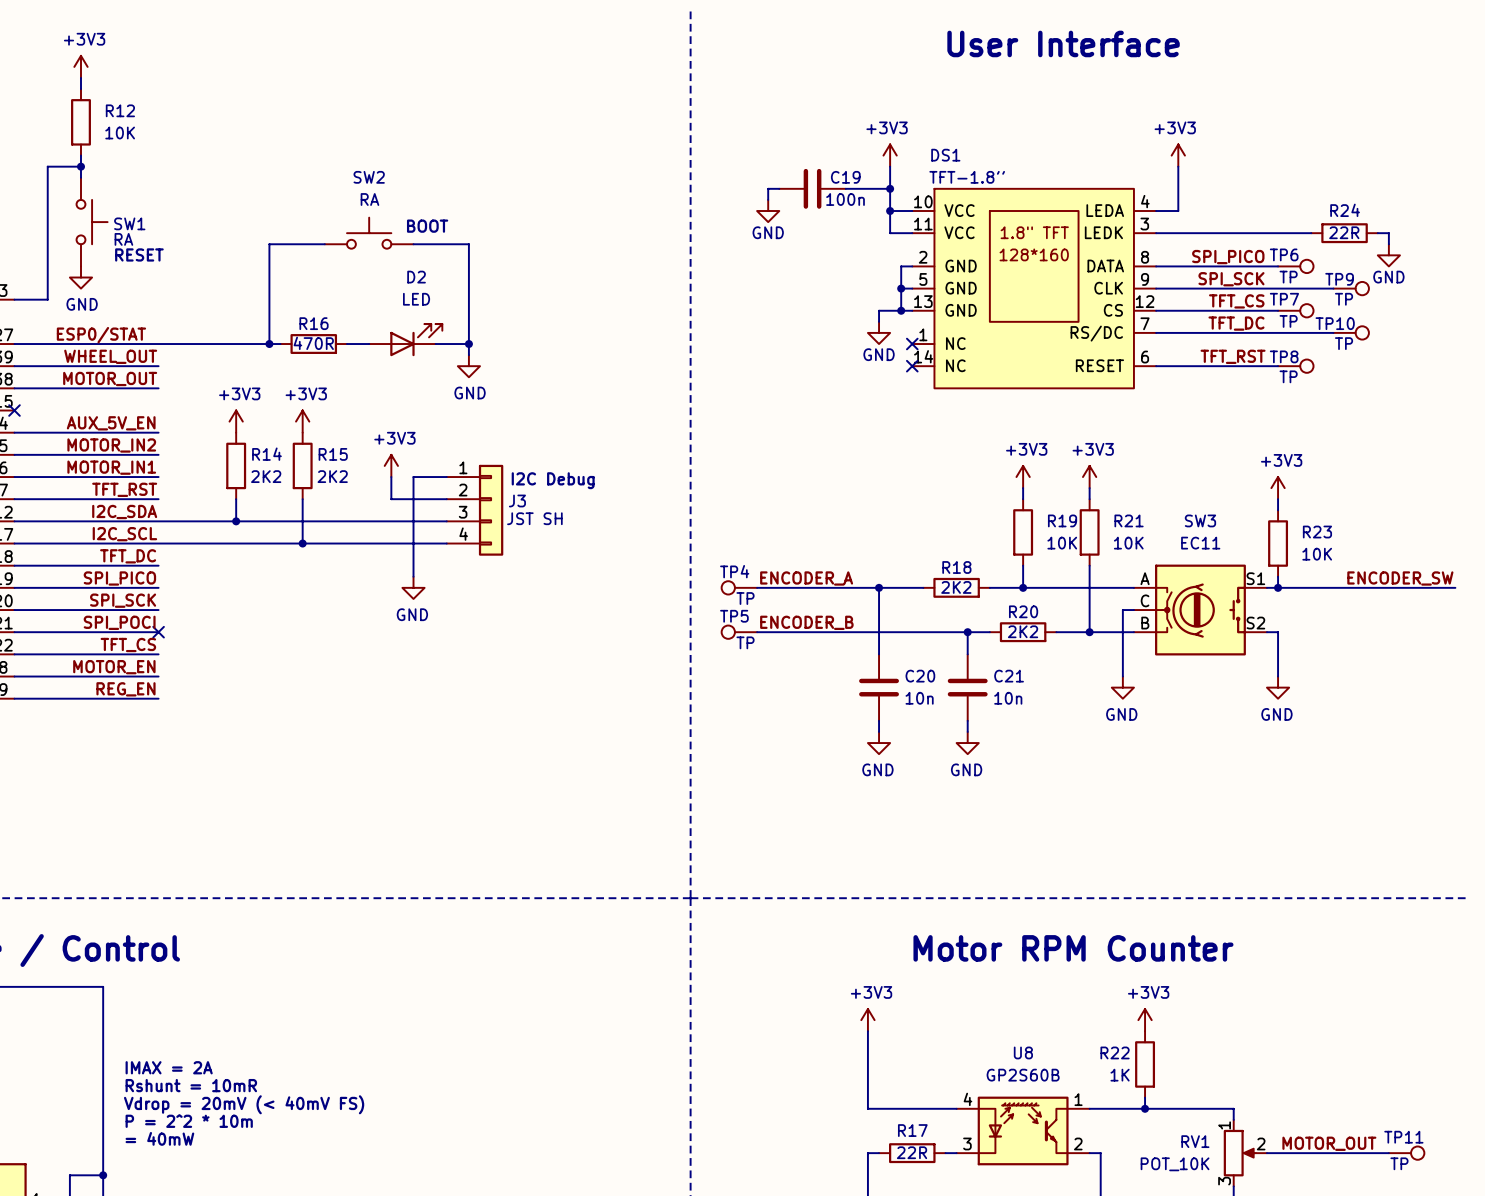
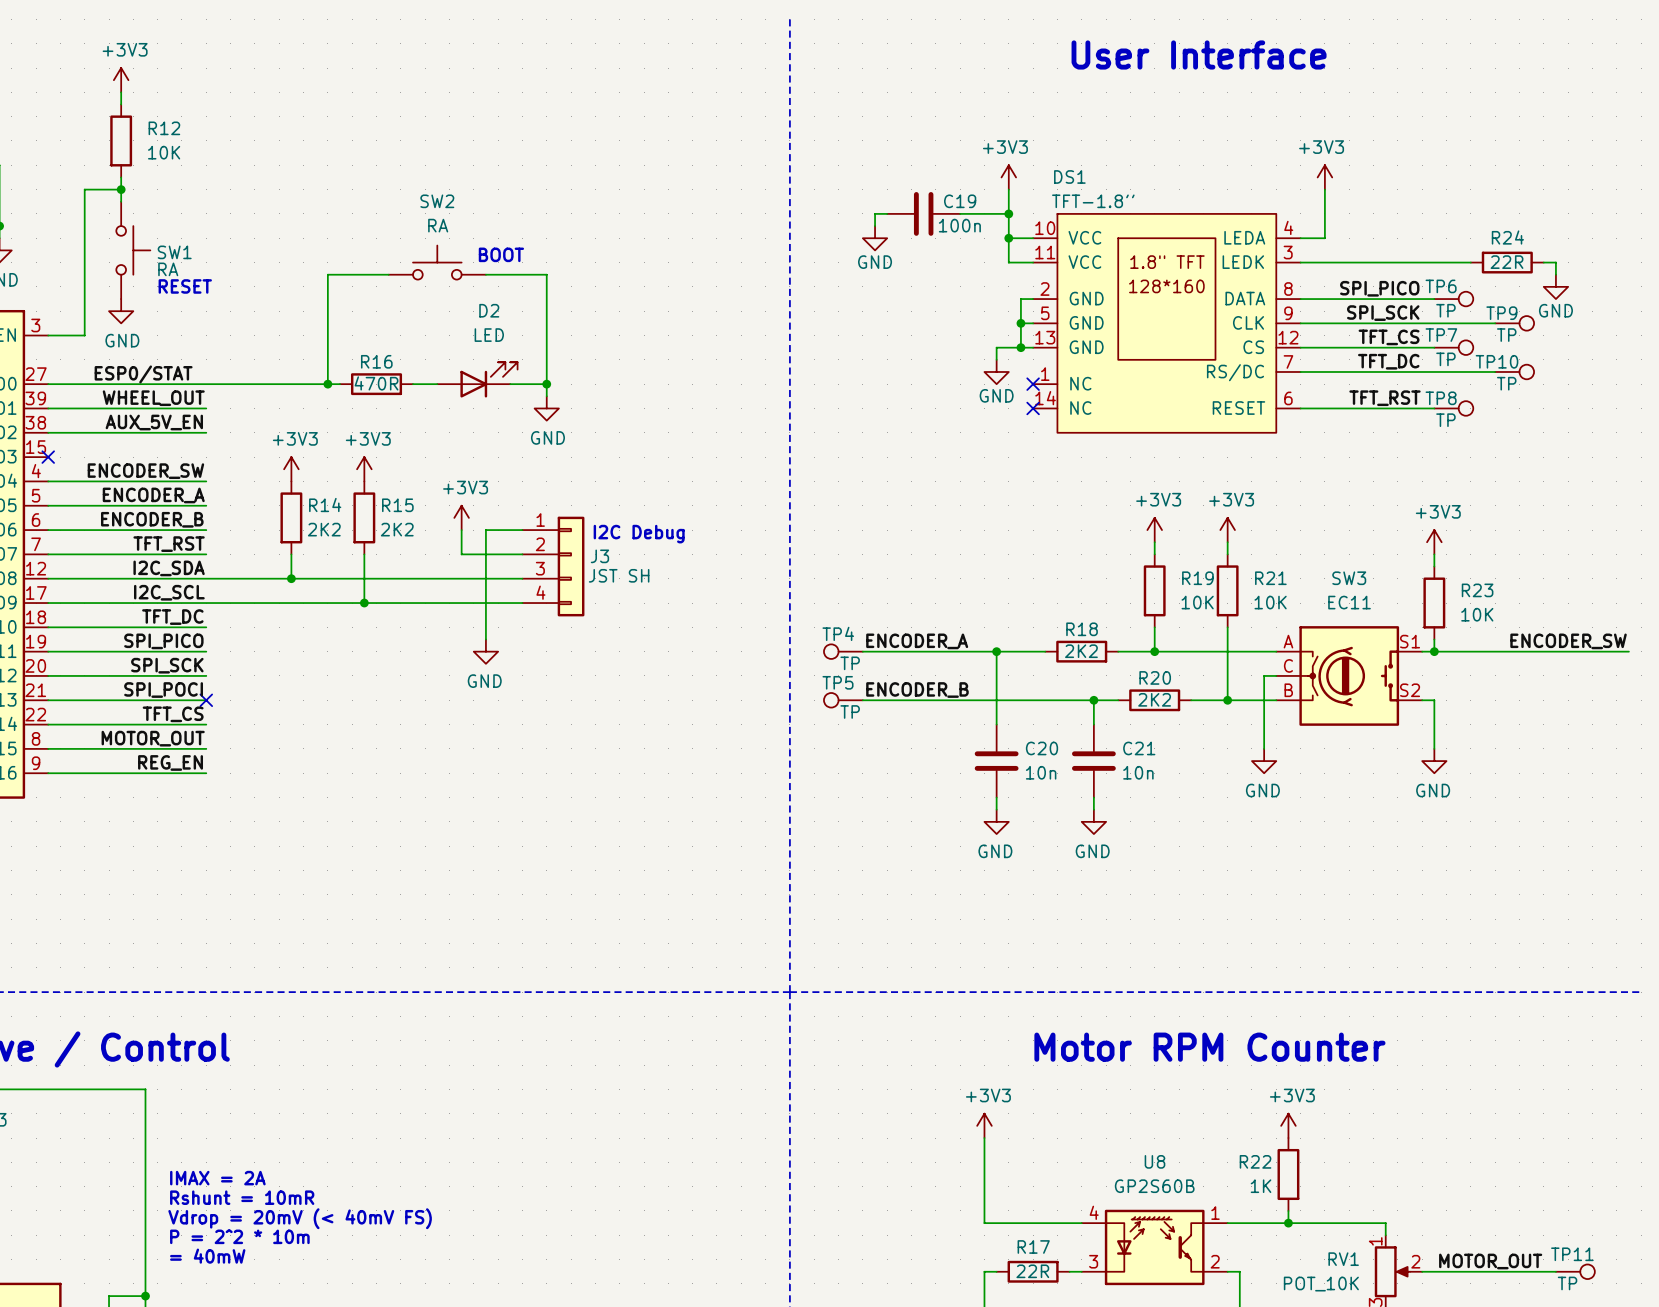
label: MOTOR_OUT (110, 378) -> AUX_5V_EN (154, 422)
label: AUX_5V_EN (111, 423) -> ENCODER_SW (145, 471)
label: MOTOR_IN2 (111, 445) -> ENCODER_A (153, 495)
label: MOTOR_IN1 (111, 467) -> ENCODER_B (152, 519)
label: MOTOR_EN (114, 667) -> MOTOR_OUT (153, 738)

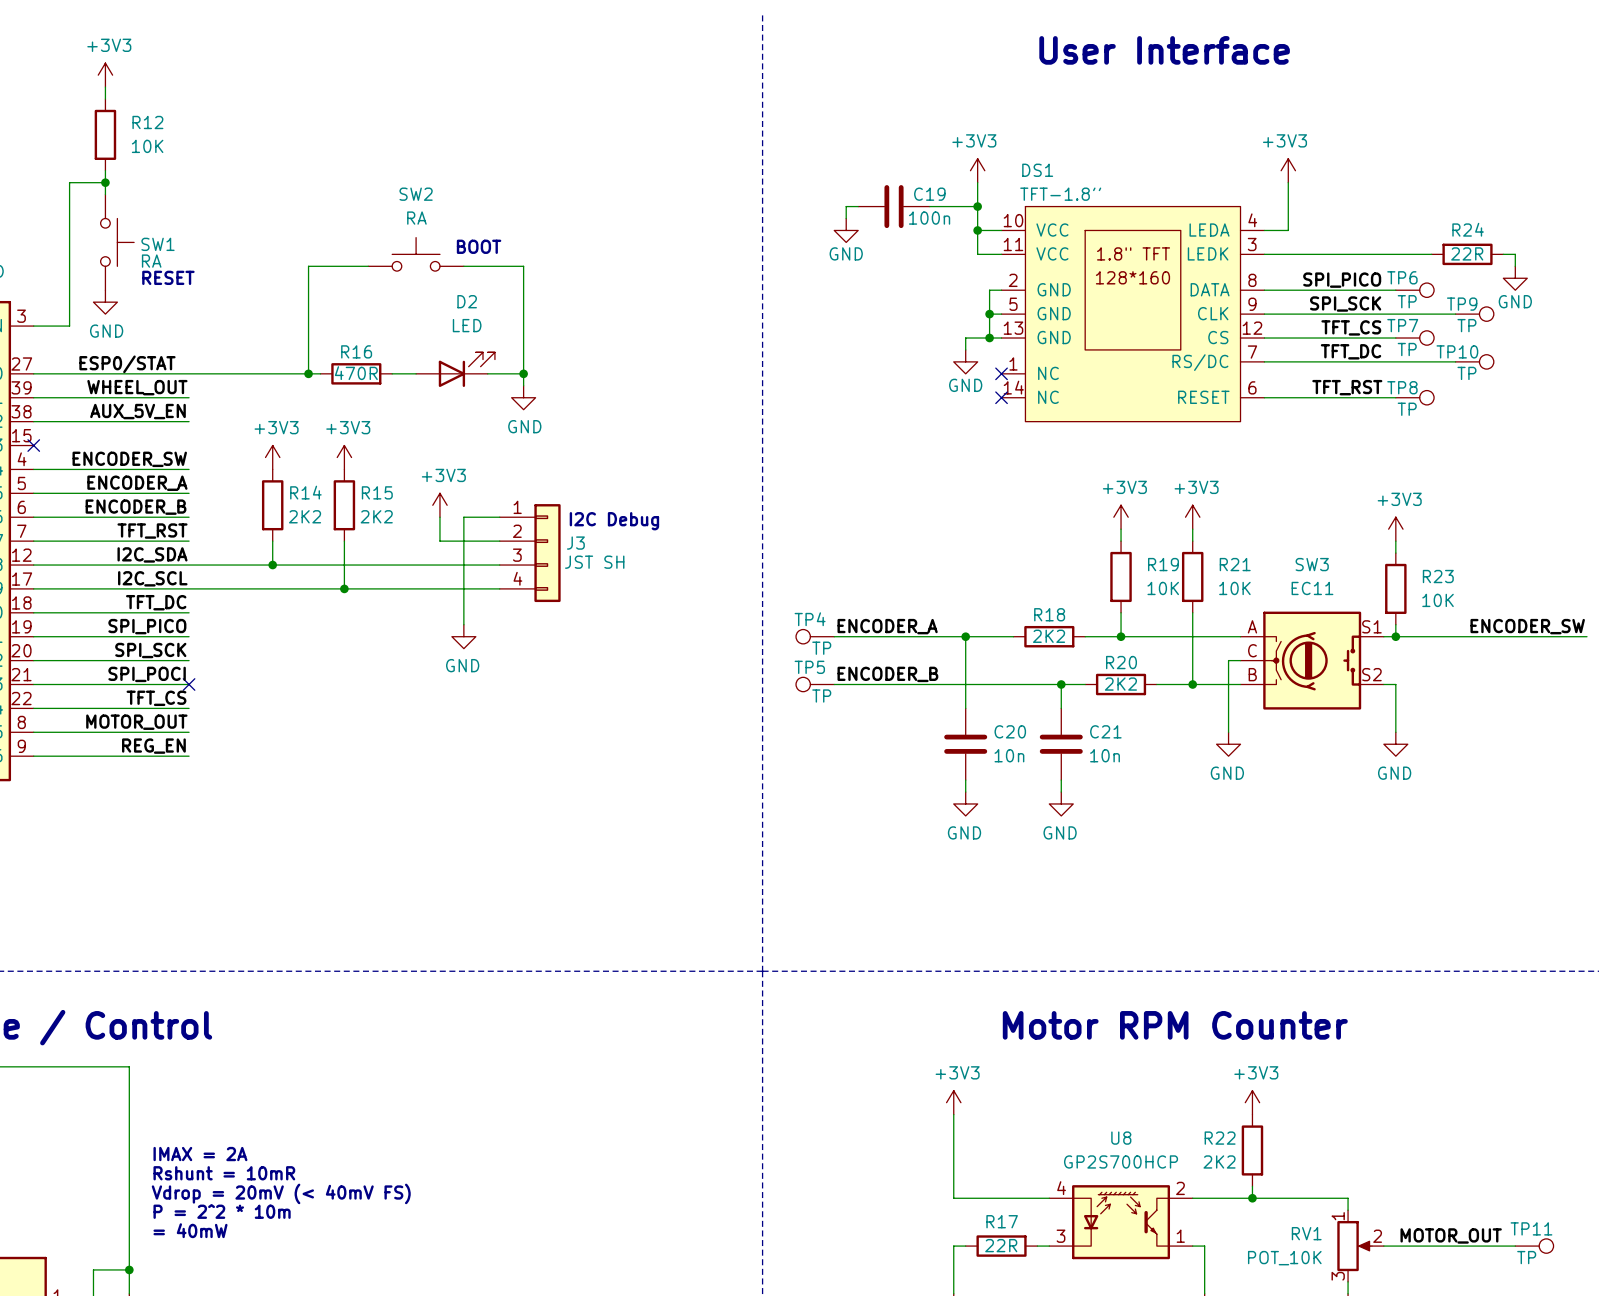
U8 value: GP2S60B (1154, 1186) -> GP2S700HCP (1121, 1161)
R22 value: 1K (1261, 1186) -> 2K2 (1219, 1161)
U8 pin number: 1 (1215, 1213) -> 2 (1180, 1188)
U8 pin number: 2 (1215, 1261) -> 1 (1180, 1236)

